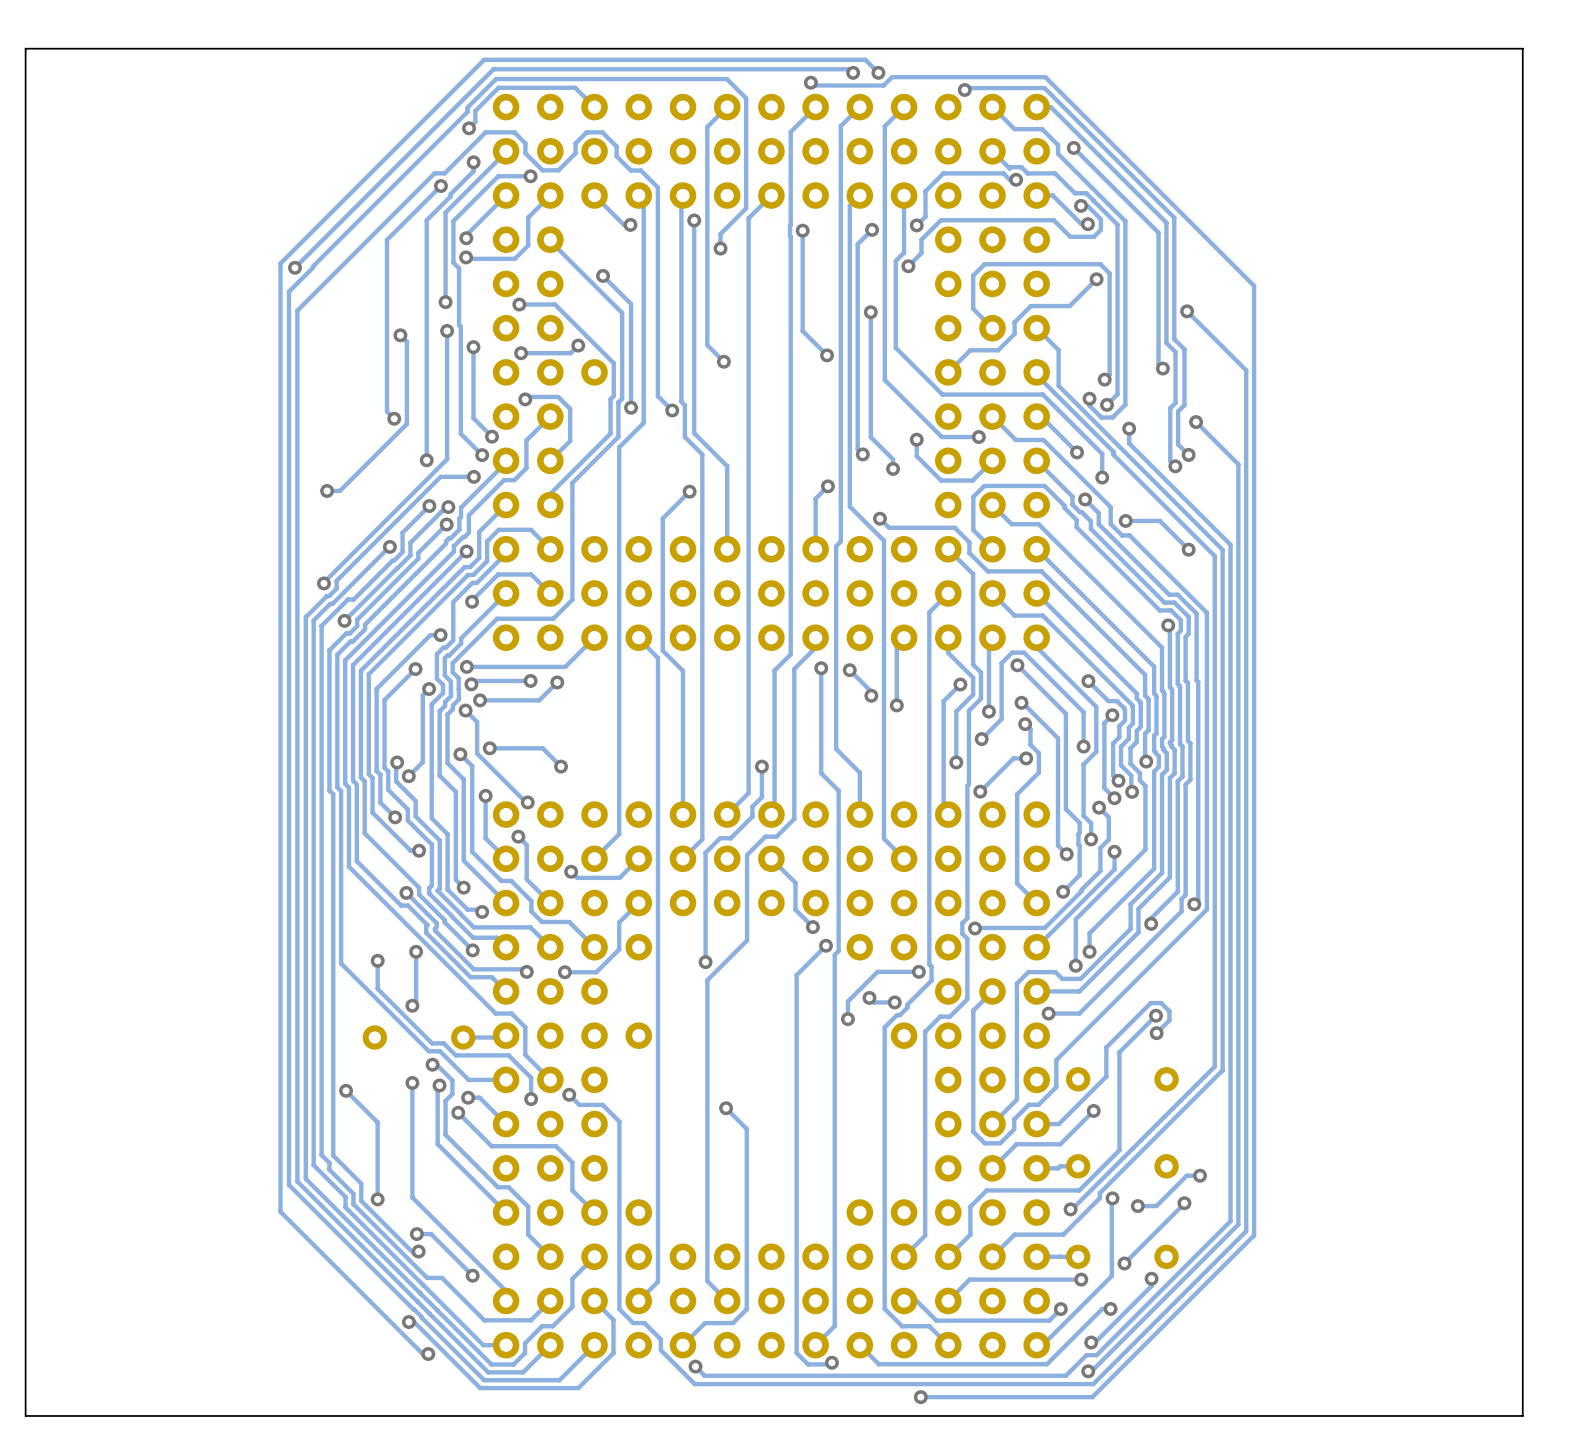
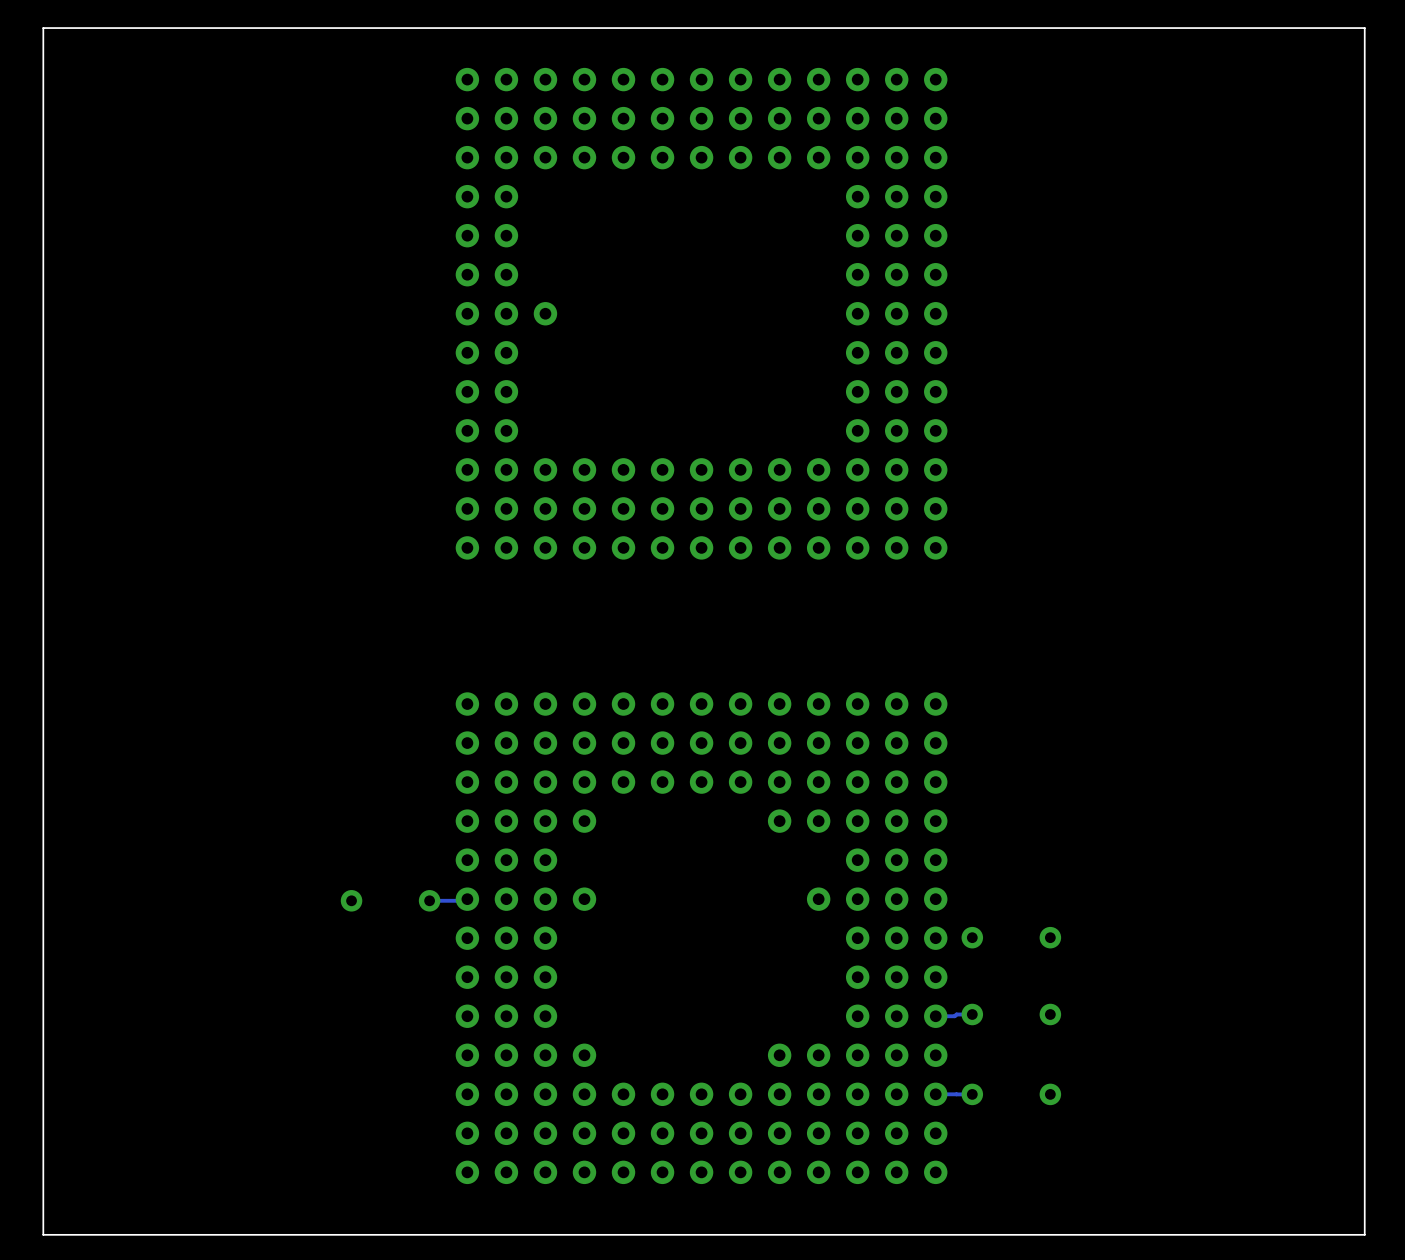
track: (853, 72) (849, 69) (493, 69) (294, 267) -> none
via: (853, 72) -> none
track: (878, 72) (865, 59) (484, 59) (280, 263) (280, 1211) (422, 1354) (428, 1354) -> none
via: (878, 72) -> none
track: (810, 82) (813, 85) (883, 85) (892, 77) (1045, 77) (1254, 285) (1254, 1235) (1092, 1397) (920, 1397) -> none
via: (810, 82) -> none
track: (964, 89) (966, 88) (1044, 88) (1174, 217) (1174, 339) (1184, 349) (1184, 405) (1178, 411) (1178, 444) (1188, 454) -> none
via: (964, 89) -> none
track: (594, 107) (575, 87) (498, 87) (475, 110) (475, 121) (469, 128) -> none
track: (727, 107) (707, 126) (707, 345) (723, 361) -> none
track: (815, 107) (790, 131) (790, 654) (774, 670) (774, 811) (771, 814) -> none
track: (859, 107) (840, 126) (840, 541) (836, 546) (836, 748) (859, 772) (859, 814) -> none
track: (904, 107) (884, 126) (884, 379) (941, 437) (978, 437) -> none
track: (992, 107) (1014, 129) (1042, 129) (1058, 145) (1058, 153) (1125, 221) (1125, 404) (1112, 417) (1101, 417) (1089, 405) (1089, 398) -> none
track: (1036, 107) (1050, 107) (1166, 222) (1166, 342) (1175, 352) (1175, 402) (1170, 408) (1170, 461) (1175, 466) -> none
via: (469, 128) -> none
track: (1073, 147) (1158, 232) (1158, 364) (1162, 368) -> none
via: (1073, 147) -> none
track: (506, 151) (445, 212) (445, 302) -> none
track: (992, 151) (1009, 168) (1021, 167) (1027, 173) (1055, 173) (1074, 193) (1086, 193) (1093, 200) -> none
track: (473, 162) (473, 171) (426, 220) (426, 460) -> none
via: (473, 162) -> none
track: (530, 176) (498, 176) (453, 221) (453, 262) (459, 268) (460, 433) (482, 455) -> none
via: (530, 176) -> none
track: (1016, 179) (1009, 179) (1003, 173) (943, 173) (925, 191) (925, 216) (916, 225) -> none
via: (1016, 179) -> none
track: (440, 186) (386, 240) (386, 411) (394, 418) -> none
via: (440, 186) -> none
track: (506, 195) (466, 235) (466, 238) -> none
track: (550, 195) (528, 217) (528, 245) (514, 258) (466, 257) -> none
track: (594, 195) (623, 224) (630, 224) -> none
track: (638, 195) (643, 200) (643, 422) (619, 447) (619, 834) (594, 858) -> none
track: (682, 195) (681, 197) (681, 401) (684, 405) (684, 437) (702, 454) (702, 839) (682, 858) -> none
track: (771, 195) (748, 218) (748, 793) (727, 814) -> none
track: (859, 195) (849, 205) (849, 506) (883, 540) (883, 838) (904, 858) -> none
track: (904, 195) (904, 252) (895, 260) (895, 347) (942, 394) (1042, 394) (1102, 453) (1102, 477) -> none
track: (1036, 195) (1052, 195) (1081, 224) (1087, 224) -> none
track: (1093, 200) (1117, 224) (1117, 394) (1106, 404) -> none
track: (1081, 205) (1087, 205) (1100, 219) (1100, 229) (1094, 236) (1070, 236) (1053, 220) (940, 220) (921, 239) (921, 253) (908, 266) -> none
via: (1081, 205) -> none
track: (694, 220) (694, 433) (727, 466) (727, 549) -> none
via: (694, 220) -> none
via: (630, 224) -> none
via: (1087, 224) -> none
via: (916, 225) -> none
track: (872, 229) (857, 244) (857, 449) (862, 454) -> none
via: (872, 229) -> none
track: (802, 230) (802, 331) (827, 355) -> none
via: (802, 230) -> none
via: (466, 238) -> none
track: (550, 239) (622, 312) (622, 398) (618, 402) (618, 436) (572, 482) (572, 599) (553, 618) (497, 618) (452, 663) (452, 672) (458, 678) (458, 689) -> none
track: (720, 248) (720, 234) (746, 208) (746, 98) (726, 79) (496, 79) (467, 107) (467, 111) (288, 291) (288, 1184) (484, 1380) (559, 1380) (594, 1345) -> none
via: (720, 248) -> none
via: (466, 257) -> none
via: (908, 266) -> none
via: (294, 267) -> none
track: (603, 275) (631, 303) (631, 407) -> none
via: (603, 275) -> none
track: (1096, 279) (1069, 306) (1030, 306) (1014, 322) (1014, 333) (998, 350) (970, 350) (948, 372) -> none
via: (1096, 279) -> none
via: (445, 302) -> none
track: (519, 304) (555, 304) (613, 363) (613, 396) (610, 399) (610, 433) (550, 493) (550, 505) -> none
via: (519, 304) -> none
track: (1187, 311) (1246, 370) (1246, 1231) (1093, 1384) (694, 1384) (660, 1350) (660, 1339) (644, 1323) (633, 1323) (619, 1309) (619, 1121) (602, 1104) (579, 1104) (569, 1094) -> none
via: (1187, 311) -> none
track: (870, 312) (870, 437) (893, 459) (893, 468) -> none
via: (870, 312) -> none
track: (992, 328) (973, 308) (973, 275) (984, 264) (1100, 264) (1109, 273) (1109, 374) (1104, 379) -> none
track: (1036, 328) (1058, 350) (1058, 385) (1222, 549) (1222, 1070) (1099, 1193) (1099, 1198) (1063, 1234) (1014, 1234) (992, 1256) -> none
track: (447, 330) (447, 459) (323, 583) -> none
via: (447, 330) -> none
track: (400, 335) (406, 341) (406, 424) (339, 490) (327, 490) -> none
via: (400, 335) -> none
track: (578, 345) (570, 353) (521, 353) -> none
via: (578, 345) -> none
track: (473, 347) (473, 418) (492, 436) -> none
via: (473, 347) -> none
via: (521, 353) -> none
via: (827, 355) -> none
via: (723, 361) -> none
via: (1162, 368) -> none
track: (1036, 372) (1036, 375) (1113, 451) (1113, 454) (1214, 556) (1214, 1066) (1070, 1209) -> none
via: (1104, 379) -> none
via: (1089, 398) -> none
track: (525, 399) (527, 396) (558, 396) (570, 408) (570, 440) (550, 460) -> none
via: (525, 399) -> none
via: (1106, 404) -> none
via: (631, 407) -> none
track: (672, 410) (657, 396) (657, 187) (640, 170) (630, 170) (616, 156) (616, 146) (602, 132) (586, 132) (575, 143) (575, 153) (558, 170) (542, 170) (525, 153) (525, 143) (514, 132) (485, 132) (444, 173) (434, 173) (297, 310) (297, 1181) (417, 1301) -> none
via: (672, 410) -> none
track: (550, 416) (526, 440) (526, 468) (514, 480) (504, 480) (468, 515) (468, 532) (453, 546) (453, 551) (345, 660) (345, 784) (348, 787) (348, 866) (495, 1013) (511, 1013) (525, 1027) (525, 1054) (550, 1079) -> none
track: (992, 416) (1015, 439) (1043, 439) (1110, 507) (1110, 524) (1122, 535) (1129, 535) (1206, 612) (1206, 909) (1056, 1060) (1056, 1087) (1038, 1104) (1028, 1104) (1014, 1119) (1014, 1129) (1000, 1143) (984, 1143) (973, 1131) (973, 1010) (992, 991) -> none
track: (1036, 416) (1041, 416) (1077, 452) -> none
via: (394, 418) -> none
track: (1196, 422) (1238, 464) (1238, 1224) (1091, 1371) (1088, 1371) -> none
via: (1196, 422) -> none
track: (1129, 428) (1129, 443) (1230, 544) (1230, 1221) (1096, 1355) (1086, 1355) (1065, 1375) (704, 1375) (695, 1366) -> none
via: (1129, 428) -> none
via: (492, 436) -> none
via: (978, 437) -> none
track: (916, 439) (916, 456) (941, 480) (972, 480) (992, 460) -> none
via: (916, 439) -> none
via: (1077, 452) -> none
via: (862, 454) -> none
via: (1188, 454) -> none
via: (482, 455) -> none
via: (426, 460) -> none
track: (506, 460) (461, 507) (459, 529) (365, 624) (365, 629) (337, 654) (337, 787) (341, 791) (341, 963) (428, 1051) (440, 1051) (468, 1079) (506, 1079) -> none
track: (1036, 460) (1072, 496) (1072, 504) (1090, 521) (1090, 528) (1164, 602) (1174, 602) (1188, 616) (1188, 633) (1185, 636) (1185, 680) (1187, 682) (1190, 779) (1185, 784) (1185, 895) (1181, 899) (1181, 911) (1079, 1013) (1048, 1013) -> none
via: (1175, 466) -> none
via: (893, 468) -> none
track: (473, 476) (440, 476) (336, 580) (336, 588) (305, 617) (305, 1178) (491, 1364) (513, 1364) (525, 1353) (525, 1343) (542, 1326) (552, 1326) (572, 1306) (572, 1278) (594, 1256) -> none
via: (473, 476) -> none
via: (1102, 477) -> none
track: (827, 486) (815, 498) (815, 549) -> none
via: (827, 486) -> none
via: (327, 490) -> none
track: (689, 491) (662, 518) (662, 650) (682, 670) (682, 814) -> none
via: (689, 491) -> none
track: (1085, 499) (1098, 513) (1098, 524) (1169, 594) (1177, 594) (1196, 613) (1198, 900) (1194, 904) -> none
via: (1085, 499) -> none
track: (506, 505) (479, 531) (479, 557) (470, 567) (464, 567) (360, 670) (360, 777) (364, 781) (364, 833) (419, 887) (419, 894) (472, 950) -> none
track: (992, 505) (1011, 524) (1038, 524) (1162, 647) (1162, 690) (1164, 693) (1164, 736) (1162, 739) (1162, 746) (1166, 753) (1166, 770) (1162, 774) (1162, 872) (1130, 904) (1130, 928) (1080, 978) (1062, 978) (1055, 972) (1028, 972) (1016, 983) (1016, 1099) (992, 1124) -> none
track: (429, 506) (402, 532) (402, 552) (353, 599) (347, 599) (321, 625) (321, 1155) (329, 1162) (329, 1169) (353, 1193) (353, 1204) (427, 1277) (442, 1277) (484, 1320) (530, 1320) (550, 1300) -> none
via: (429, 506) -> none
track: (448, 507) (410, 542) (410, 555) (344, 620) -> none
via: (448, 507) -> none
track: (879, 518) (889, 527) (954, 527) (969, 542) (969, 552) (987, 571) (1041, 571) (1145, 674) (1145, 695) (1148, 700) (1148, 730) (1145, 733) (1146, 761) -> none
via: (879, 518) -> none
track: (1125, 520) (1159, 520) (1188, 549) -> none
via: (1125, 520) -> none
track: (446, 524) (418, 552) (418, 558) (357, 619) (357, 626) (349, 633) (346, 633) (329, 650) (329, 790) (333, 794) (333, 1155) (361, 1183) (361, 1200) (414, 1253) (418, 1251) -> none
via: (446, 524) -> none
track: (389, 546) (313, 620) (313, 1165) (345, 1197) (345, 1207) (483, 1345) (506, 1345) -> none
via: (389, 546) -> none
track: (506, 549) (506, 553) (476, 582) (472, 582) (453, 602) (453, 640) (436, 654) (436, 678) (443, 684) (443, 693) (431, 704) (431, 818) (447, 834) (447, 889) (467, 909) (479, 909) (482, 911) -> none
track: (550, 549) (530, 529) (498, 529) (487, 541) (487, 561) (473, 574) (468, 574) (368, 674) (368, 774) (372, 778) (372, 812) (410, 850) (419, 850) -> none
track: (948, 549) (973, 574) (973, 664) (981, 672) (981, 698) (968, 710) (967, 918) (962, 923) (962, 933) (967, 938) (967, 999) (949, 1016) (940, 1016) (925, 1031) (925, 1235) (904, 1256) -> none
track: (992, 549) (973, 530) (973, 496) (984, 485) (1044, 485) (1076, 519) (1076, 527) (1159, 610) (1171, 610) (1180, 620) (1180, 630) (1177, 633) (1177, 683) (1180, 687) (1180, 744) (1182, 746) (1182, 776) (1177, 781) (1177, 891) (1151, 918) (1151, 923) -> none
track: (1036, 549) (1154, 666) (1154, 693) (1156, 696) (1156, 733) (1154, 735) (1154, 750) (1158, 756) (1158, 766) (1154, 771) (1154, 868) (1089, 933) (1089, 951) -> none
via: (1188, 549) -> none
track: (466, 551) (353, 665) (353, 780) (356, 784) (356, 861) (401, 905) (407, 905) (427, 925) (426, 932) (470, 977) (491, 977) (506, 991) -> none
via: (466, 551) -> none
via: (323, 583) -> none
track: (506, 593) (461, 638) (461, 643) (444, 658) (444, 675) (450, 681) (450, 692) -> none
track: (550, 593) (531, 574) (498, 574) (472, 601) -> none
track: (948, 593) (929, 612) (929, 964) (931, 966) (931, 980) (907, 1004) (907, 1007) (884, 1027) (884, 1308) (902, 1326) (929, 1326) (948, 1345) -> none
track: (992, 593) (1014, 615) (1042, 615) (1132, 705) (1132, 723) (1128, 727) (1128, 738) (1121, 746) (1121, 765) (1131, 775) (1132, 791) -> none
track: (1036, 593) (1136, 693) (1136, 698) (1140, 703) (1140, 726) (1136, 730) (1136, 742) (1130, 748) (1130, 763) (1139, 773) (1139, 780) (1145, 785) (1145, 849) (1075, 919) (1075, 965) -> none
via: (472, 601) -> none
via: (344, 620) -> none
track: (1168, 625) (1169, 627) (1169, 687) (1172, 690) (1172, 739) (1169, 743) (1174, 749) (1174, 773) (1169, 778) (1169, 877) (1138, 908) (1138, 932) (1079, 991) (1036, 991) -> none
via: (1168, 625) -> none
track: (440, 635) (430, 635) (376, 688) (376, 771) (380, 774) (380, 802) (395, 817) -> none
via: (440, 635) -> none
track: (594, 637) (565, 666) (466, 666) -> none
track: (638, 637) (657, 657) (657, 1281) (638, 1300) -> none
track: (815, 637) (815, 647) (794, 668) (794, 818) (776, 836) (765, 836) (747, 855) (747, 940) (707, 980) (707, 1281) (727, 1300) -> none
track: (904, 637) (896, 644) (896, 705) -> none
track: (948, 637) (948, 652) (973, 677) (973, 694) (956, 711) (956, 762) -> none
track: (992, 637) (988, 641) (988, 711) -> none
track: (1036, 637) (1036, 647) (1096, 706) (1096, 751) (1083, 764) (1083, 815) (1091, 823) (1091, 839) -> none
track: (1017, 665) (1065, 713) (1065, 809) (1079, 822) (1079, 875) (1063, 891) -> none
via: (1017, 665) -> none
via: (466, 666) -> none
track: (821, 668) (821, 773) (838, 790) (838, 950) (834, 954) (834, 1326) (815, 1345) -> none
via: (821, 668) -> none
track: (415, 669) (384, 700) (384, 767) (388, 771) (388, 789) (407, 809) (407, 820) (431, 844) (431, 885) (429, 888) (429, 893) (473, 937) (496, 937) (506, 947) -> none
via: (415, 669) -> none
track: (849, 670) (871, 691) (871, 695) -> none
via: (849, 670) -> none
track: (530, 680) (474, 680) (471, 684) -> none
via: (530, 680) -> none
track: (1088, 681) (1108, 701) (1117, 701) (1125, 709) (1125, 720) (1119, 726) (1119, 737) (1113, 743) (1113, 775) (1118, 780) -> none
via: (1088, 681) -> none
track: (557, 682) (539, 700) (480, 700) -> none
via: (557, 682) -> none
via: (471, 684) -> none
track: (960, 684) (943, 701) (943, 809) (948, 814) -> none
via: (960, 684) -> none
track: (429, 689) (422, 695) (422, 762) (408, 776) -> none
via: (429, 689) -> none
track: (458, 689) (458, 699) (447, 714) (447, 763) (463, 779) (463, 860) (506, 903) -> none
track: (451, 693) (451, 696) (445, 702) (445, 705) (439, 711) (439, 775) (455, 791) (455, 879) (463, 887) -> none
via: (871, 695) -> none
via: (480, 700) -> none
track: (1021, 702) (1058, 738) (1058, 845) (1066, 854) -> none
via: (1021, 702) -> none
via: (896, 705) -> none
track: (465, 710) (477, 722) (477, 753) (527, 802) -> none
via: (465, 710) -> none
via: (988, 711) -> none
track: (1112, 715) (1104, 723) (1104, 788) (1114, 798) -> none
via: (1112, 715) -> none
track: (1025, 724) (1030, 729) (1030, 744) (1038, 753) (1038, 772) (1017, 794) (1017, 883) (1036, 903) -> none
via: (1025, 724) -> none
track: (981, 739) (1001, 719) (1001, 663) (1012, 652) (1024, 652) (1083, 712) (1083, 746) -> none
via: (981, 739) -> none
via: (1083, 746) -> none
track: (489, 748) (542, 748) (561, 766) -> none
via: (489, 748) -> none
track: (460, 754) (472, 766) (472, 851) (501, 880) (511, 880) (531, 901) (531, 911) (541, 921) (569, 921) (594, 947) -> none
via: (460, 754) -> none
track: (1026, 758) (1013, 758) (980, 791) -> none
via: (1026, 758) -> none
via: (1146, 761) -> none
track: (397, 762) (396, 781) (415, 801) (415, 816) (439, 840) (439, 888) (437, 890) (473, 927) (530, 927) (550, 947) -> none
via: (397, 762) -> none
via: (956, 762) -> none
via: (561, 766) -> none
track: (761, 766) (761, 797) (752, 806) (752, 816) (730, 838) (720, 838) (705, 852) (705, 962) -> none
via: (761, 766) -> none
via: (408, 776) -> none
via: (1118, 780) -> none
via: (980, 791) -> none
via: (1132, 791) -> none
track: (485, 795) (485, 838) (506, 858) -> none
via: (485, 795) -> none
via: (1114, 798) -> none
via: (527, 802) -> none
track: (1099, 807) (1108, 817) (1108, 839) (1100, 847) (1100, 870) (1044, 927) (975, 928) -> none
via: (1099, 807) -> none
via: (395, 817) -> none
track: (518, 836) (526, 845) (526, 879) (550, 903) -> none
via: (518, 836) -> none
via: (1091, 839) -> none
via: (419, 850) -> none
track: (1114, 851) (1114, 869) (1036, 947) -> none
via: (1114, 851) -> none
via: (1066, 854) -> none
track: (638, 858) (619, 877) (577, 877) (571, 871) -> none
track: (771, 858) (795, 882) (795, 909) (812, 927) -> none
via: (571, 871) -> none
via: (463, 887) -> none
via: (1063, 891) -> none
track: (406, 892) (436, 923) (434, 930) (473, 969) (524, 969) (526, 971) -> none
via: (406, 892) -> none
track: (638, 903) (619, 922) (619, 949) (596, 972) (564, 972) -> none
via: (1194, 904) -> none
via: (482, 911) -> none
via: (1151, 923) -> none
via: (812, 927) -> none
via: (975, 928) -> none
track: (826, 945) (796, 975) (796, 1353) (808, 1364) (830, 1364) (831, 1362) -> none
via: (826, 945) -> none
via: (472, 950) -> none
track: (416, 951) (416, 1002) (412, 1005) -> none
via: (416, 951) -> none
via: (1089, 951) -> none
track: (377, 960) (377, 988) (432, 1043) (443, 1043) (455, 1055) (508, 1055) (531, 1077) (531, 1099) -> none
via: (377, 960) -> none
via: (705, 962) -> none
via: (1075, 965) -> none
via: (526, 971) -> none
track: (918, 971) (877, 971) (847, 1001) (847, 1019) -> none
via: (918, 971) -> none
via: (564, 972) -> none
track: (869, 997) (874, 1002) (894, 1002) -> none
via: (869, 997) -> none
via: (894, 1002) -> none
via: (412, 1005) -> none
via: (1048, 1013) -> none
track: (1156, 1015) (1119, 1052) (1119, 1150) (1079, 1190) (986, 1190) (970, 1206) (970, 1234) (948, 1256) -> none
via: (1156, 1015) -> none
via: (847, 1019) -> none
track: (1156, 1033) (1169, 1020) (1169, 1011) (1161, 1003) (1150, 1003) (1106, 1047) (1106, 1076) (1058, 1124) (1036, 1124) -> none
via: (1156, 1033) -> none
track: (432, 1064) (436, 1064) (452, 1080) (452, 1093) (445, 1100) (445, 1134) (497, 1187) (508, 1187) (528, 1206) (528, 1234) (550, 1256) -> none
via: (432, 1064) -> none
track: (412, 1082) (412, 1197) (506, 1291) (506, 1300) -> none
via: (412, 1082) -> none
track: (439, 1085) (437, 1087) (437, 1144) (506, 1212) -> none
via: (439, 1085) -> none
track: (346, 1090) (377, 1122) (377, 1199) -> none
via: (346, 1090) -> none
via: (569, 1094) -> none
track: (468, 1097) (479, 1097) (506, 1124) -> none
via: (468, 1097) -> none
via: (531, 1099) -> none
track: (726, 1108) (746, 1128) (746, 1309) (732, 1323) (705, 1323) (682, 1345) -> none
via: (726, 1108) -> none
track: (1093, 1110) (1060, 1144) (1016, 1144) (992, 1168) -> none
via: (1093, 1110) -> none
track: (458, 1112) (491, 1146) (556, 1146) (572, 1162) (572, 1190) (594, 1212) -> none
via: (458, 1112) -> none
track: (1200, 1175) (1186, 1175) (1156, 1206) (1137, 1206) -> none
via: (1200, 1175) -> none
track: (1112, 1198) (1111, 1276) (1042, 1345) (1036, 1345) -> none
via: (1112, 1198) -> none
via: (377, 1199) -> none
track: (1184, 1203) (1124, 1263) -> none
via: (1184, 1203) -> none
via: (1137, 1206) -> none
via: (1070, 1209) -> none
track: (416, 1234) (431, 1234) (472, 1275) -> none
via: (416, 1234) -> none
via: (418, 1251) -> none
via: (1124, 1263) -> none
via: (472, 1275) -> none
track: (1151, 1278) (1151, 1286) (1095, 1342) (1091, 1342) -> none
via: (1151, 1278) -> none
track: (1081, 1279) (969, 1279) (948, 1300) -> none
via: (1081, 1279) -> none
track: (594, 1300) (613, 1319) (613, 1353) (578, 1388) (480, 1388) (414, 1322) (408, 1322) -> none
track: (904, 1300) (916, 1300) (936, 1320) (1049, 1320) (1060, 1309) -> none
track: (417, 1301) (488, 1372) (523, 1372) (550, 1345) -> none
track: (1110, 1308) (1102, 1308) (1046, 1364) (878, 1364) (859, 1345) -> none
via: (1110, 1308) -> none
via: (1060, 1309) -> none
via: (408, 1322) -> none
via: (1091, 1342) -> none
via: (428, 1354) -> none
via: (831, 1362) -> none
via: (695, 1366) -> none
via: (1088, 1371) -> none
via: (920, 1397) -> none

